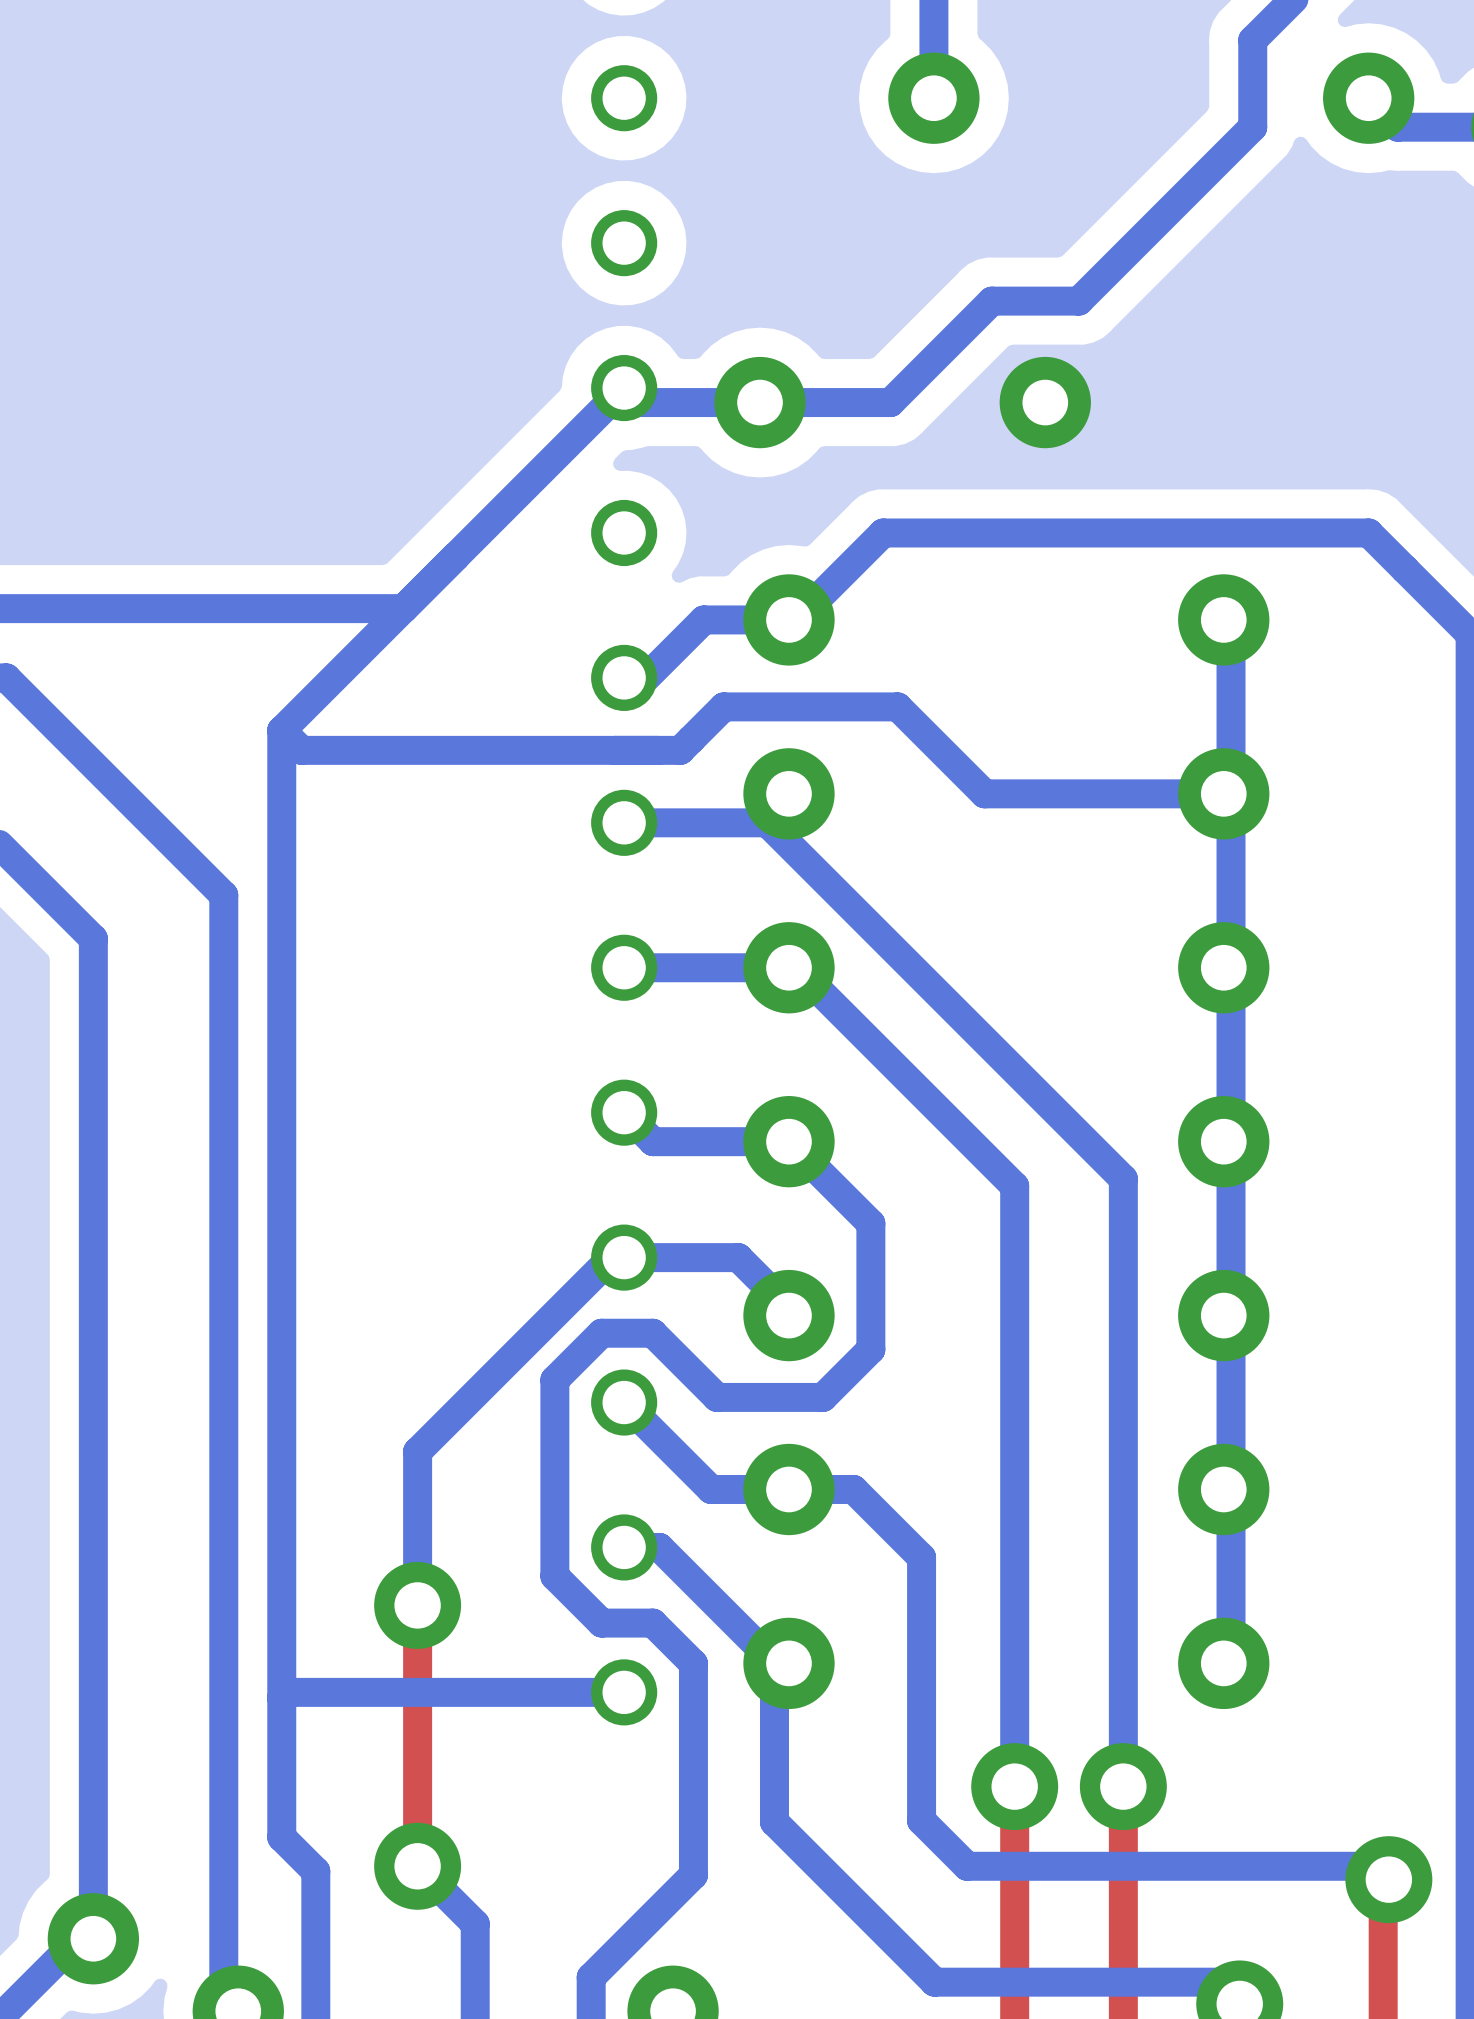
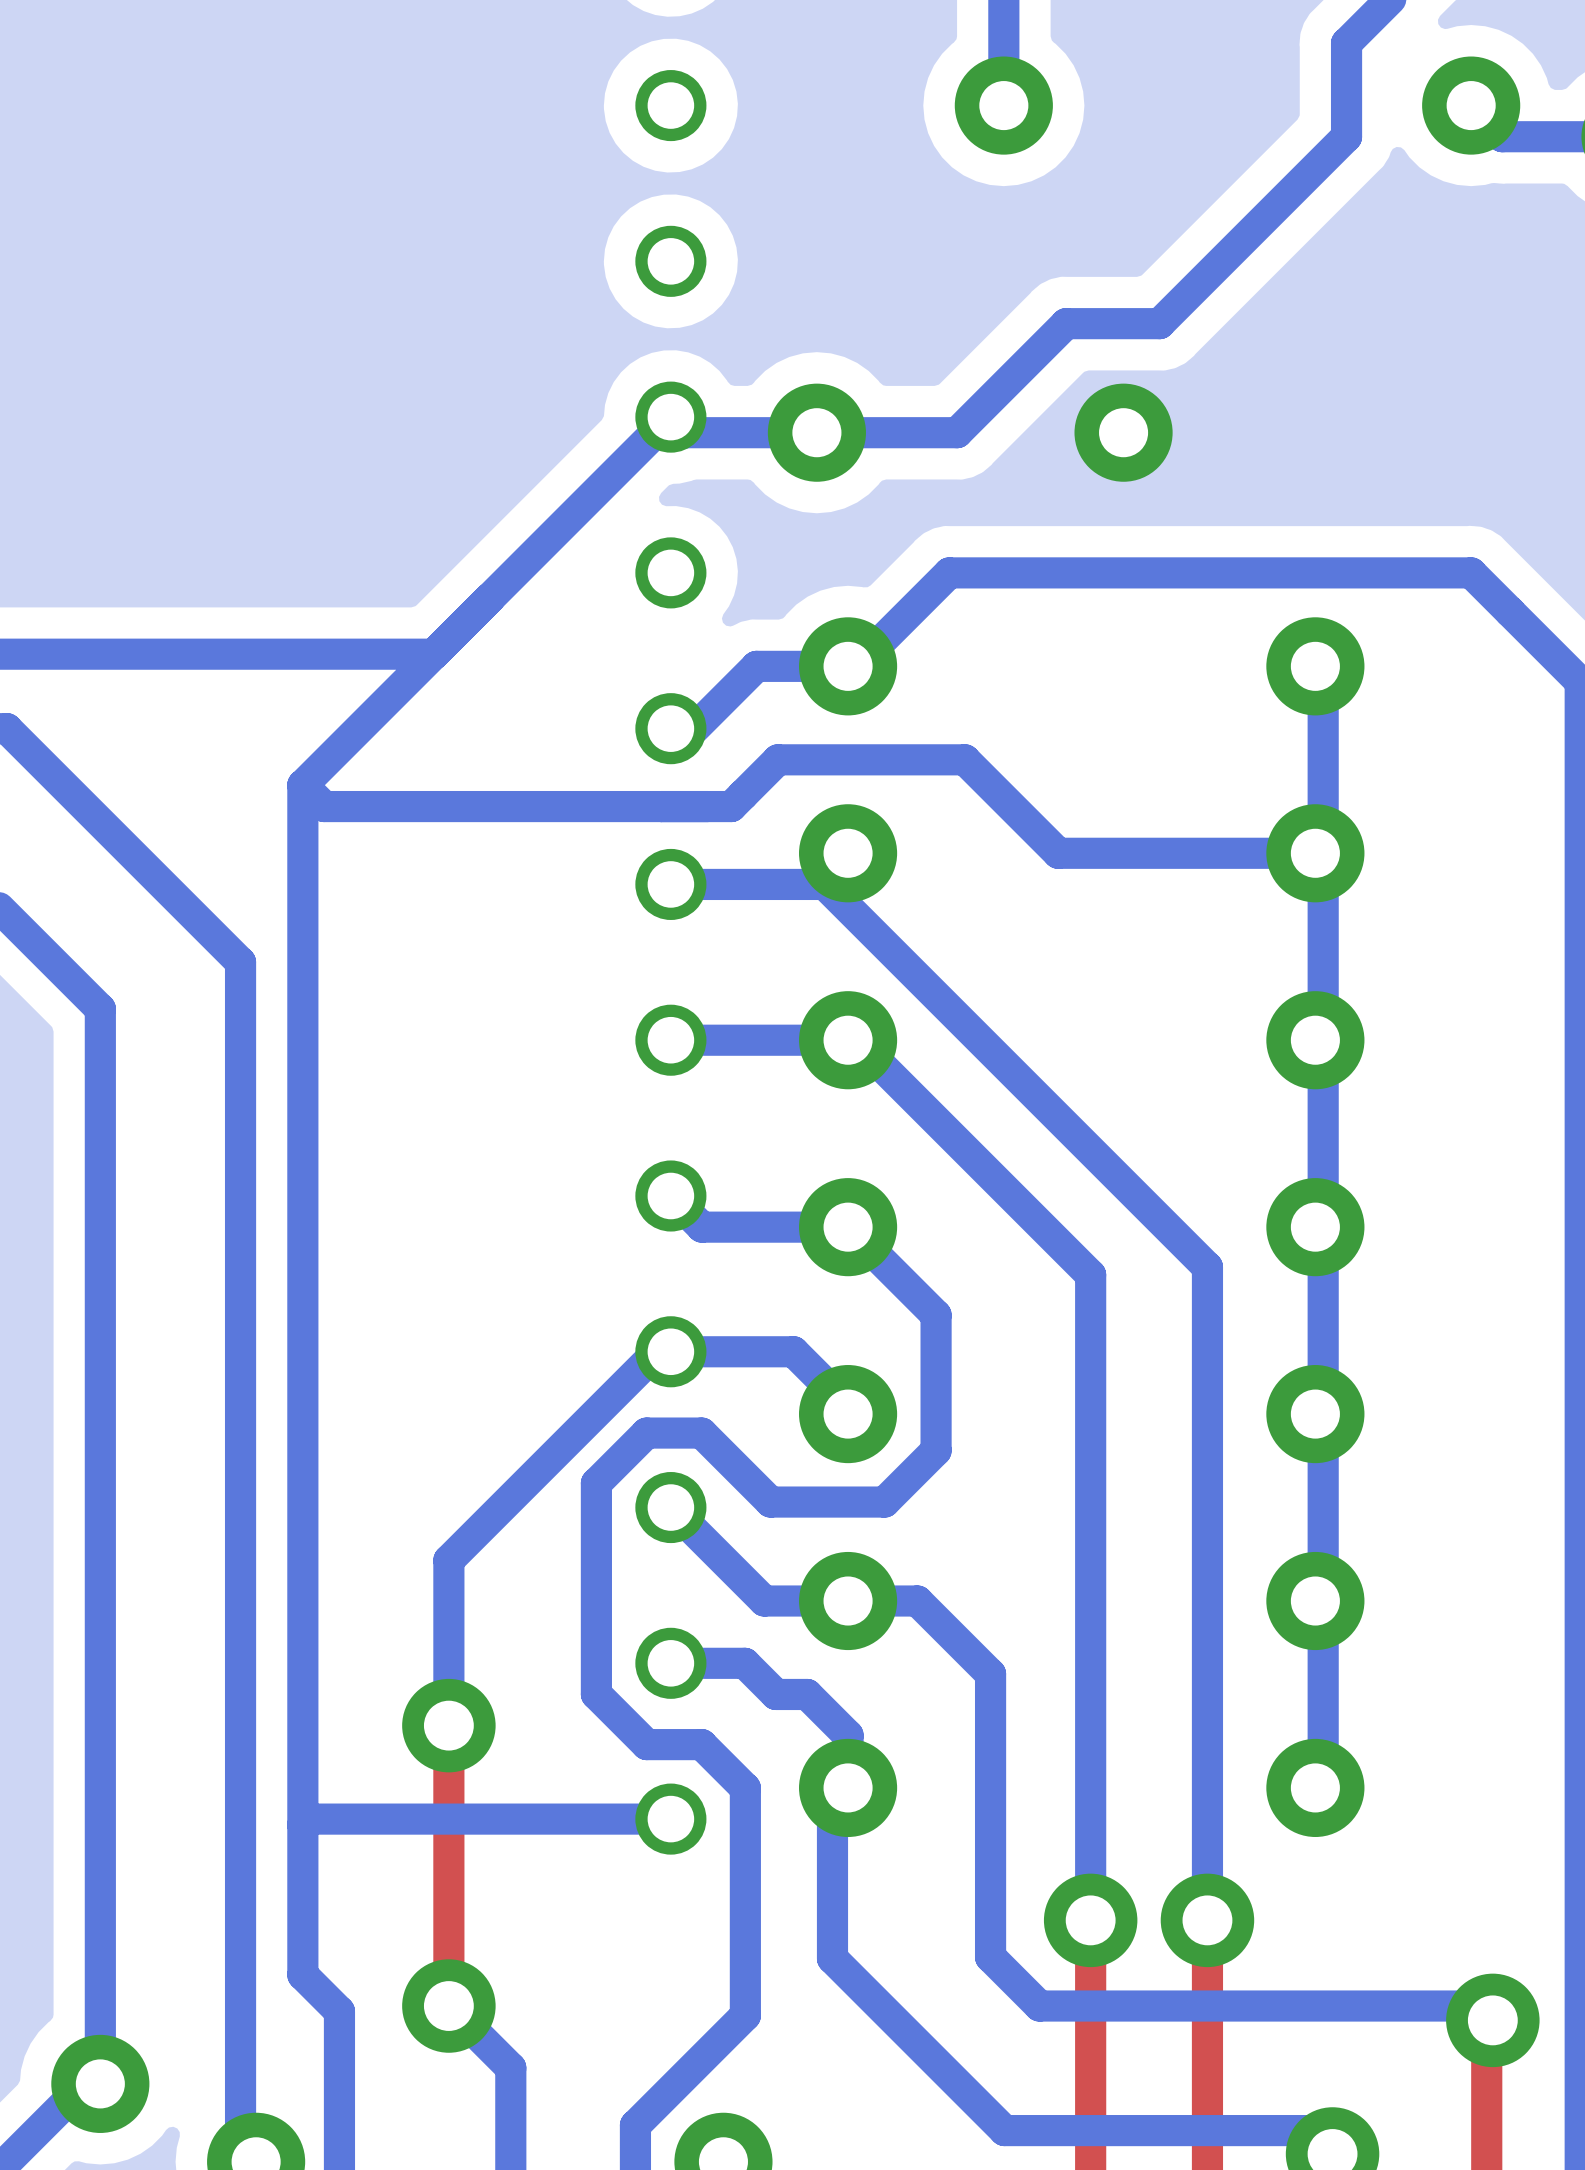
bottom track: (659, 1547) (775, 1663) -> (708, 1663) (744, 1663) (776, 1694) (807, 1694) (848, 1735) (848, 1787)

